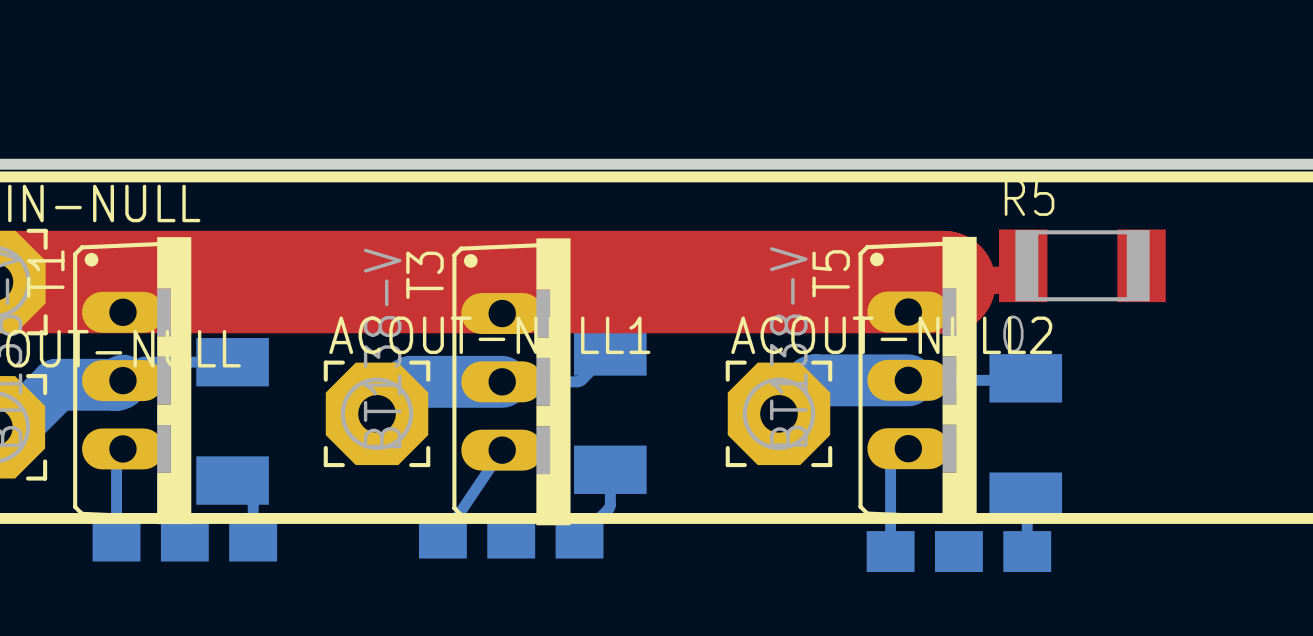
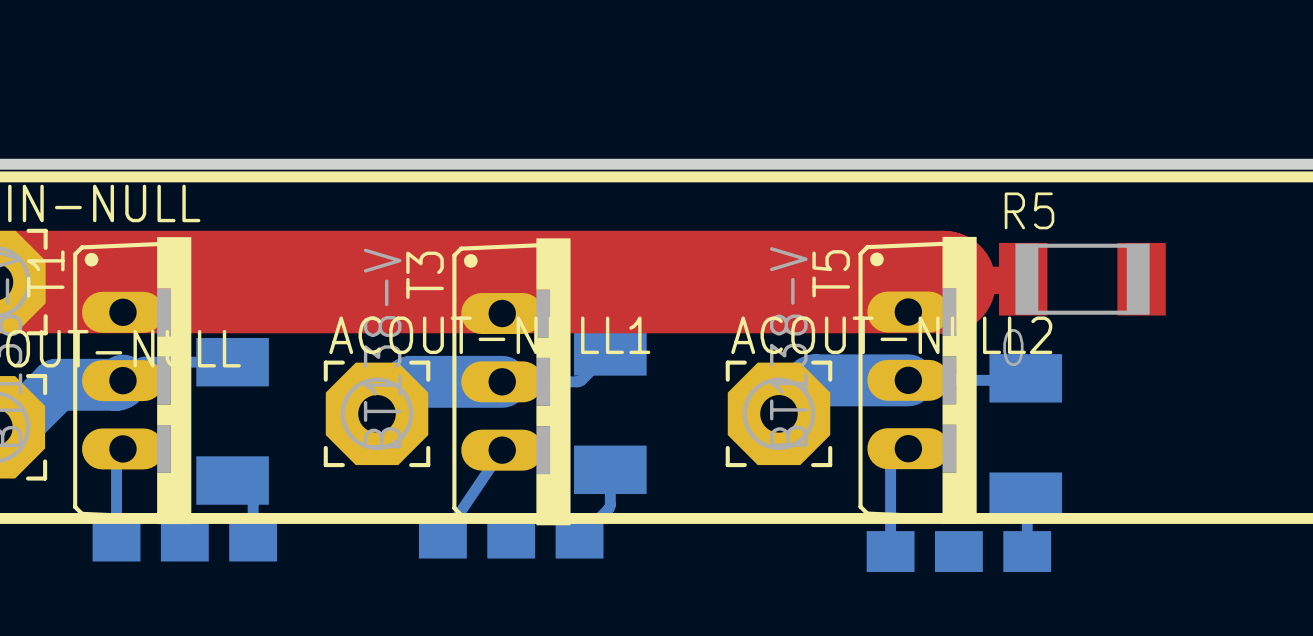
R5 position: (1082, 265) -> (1082, 279)

